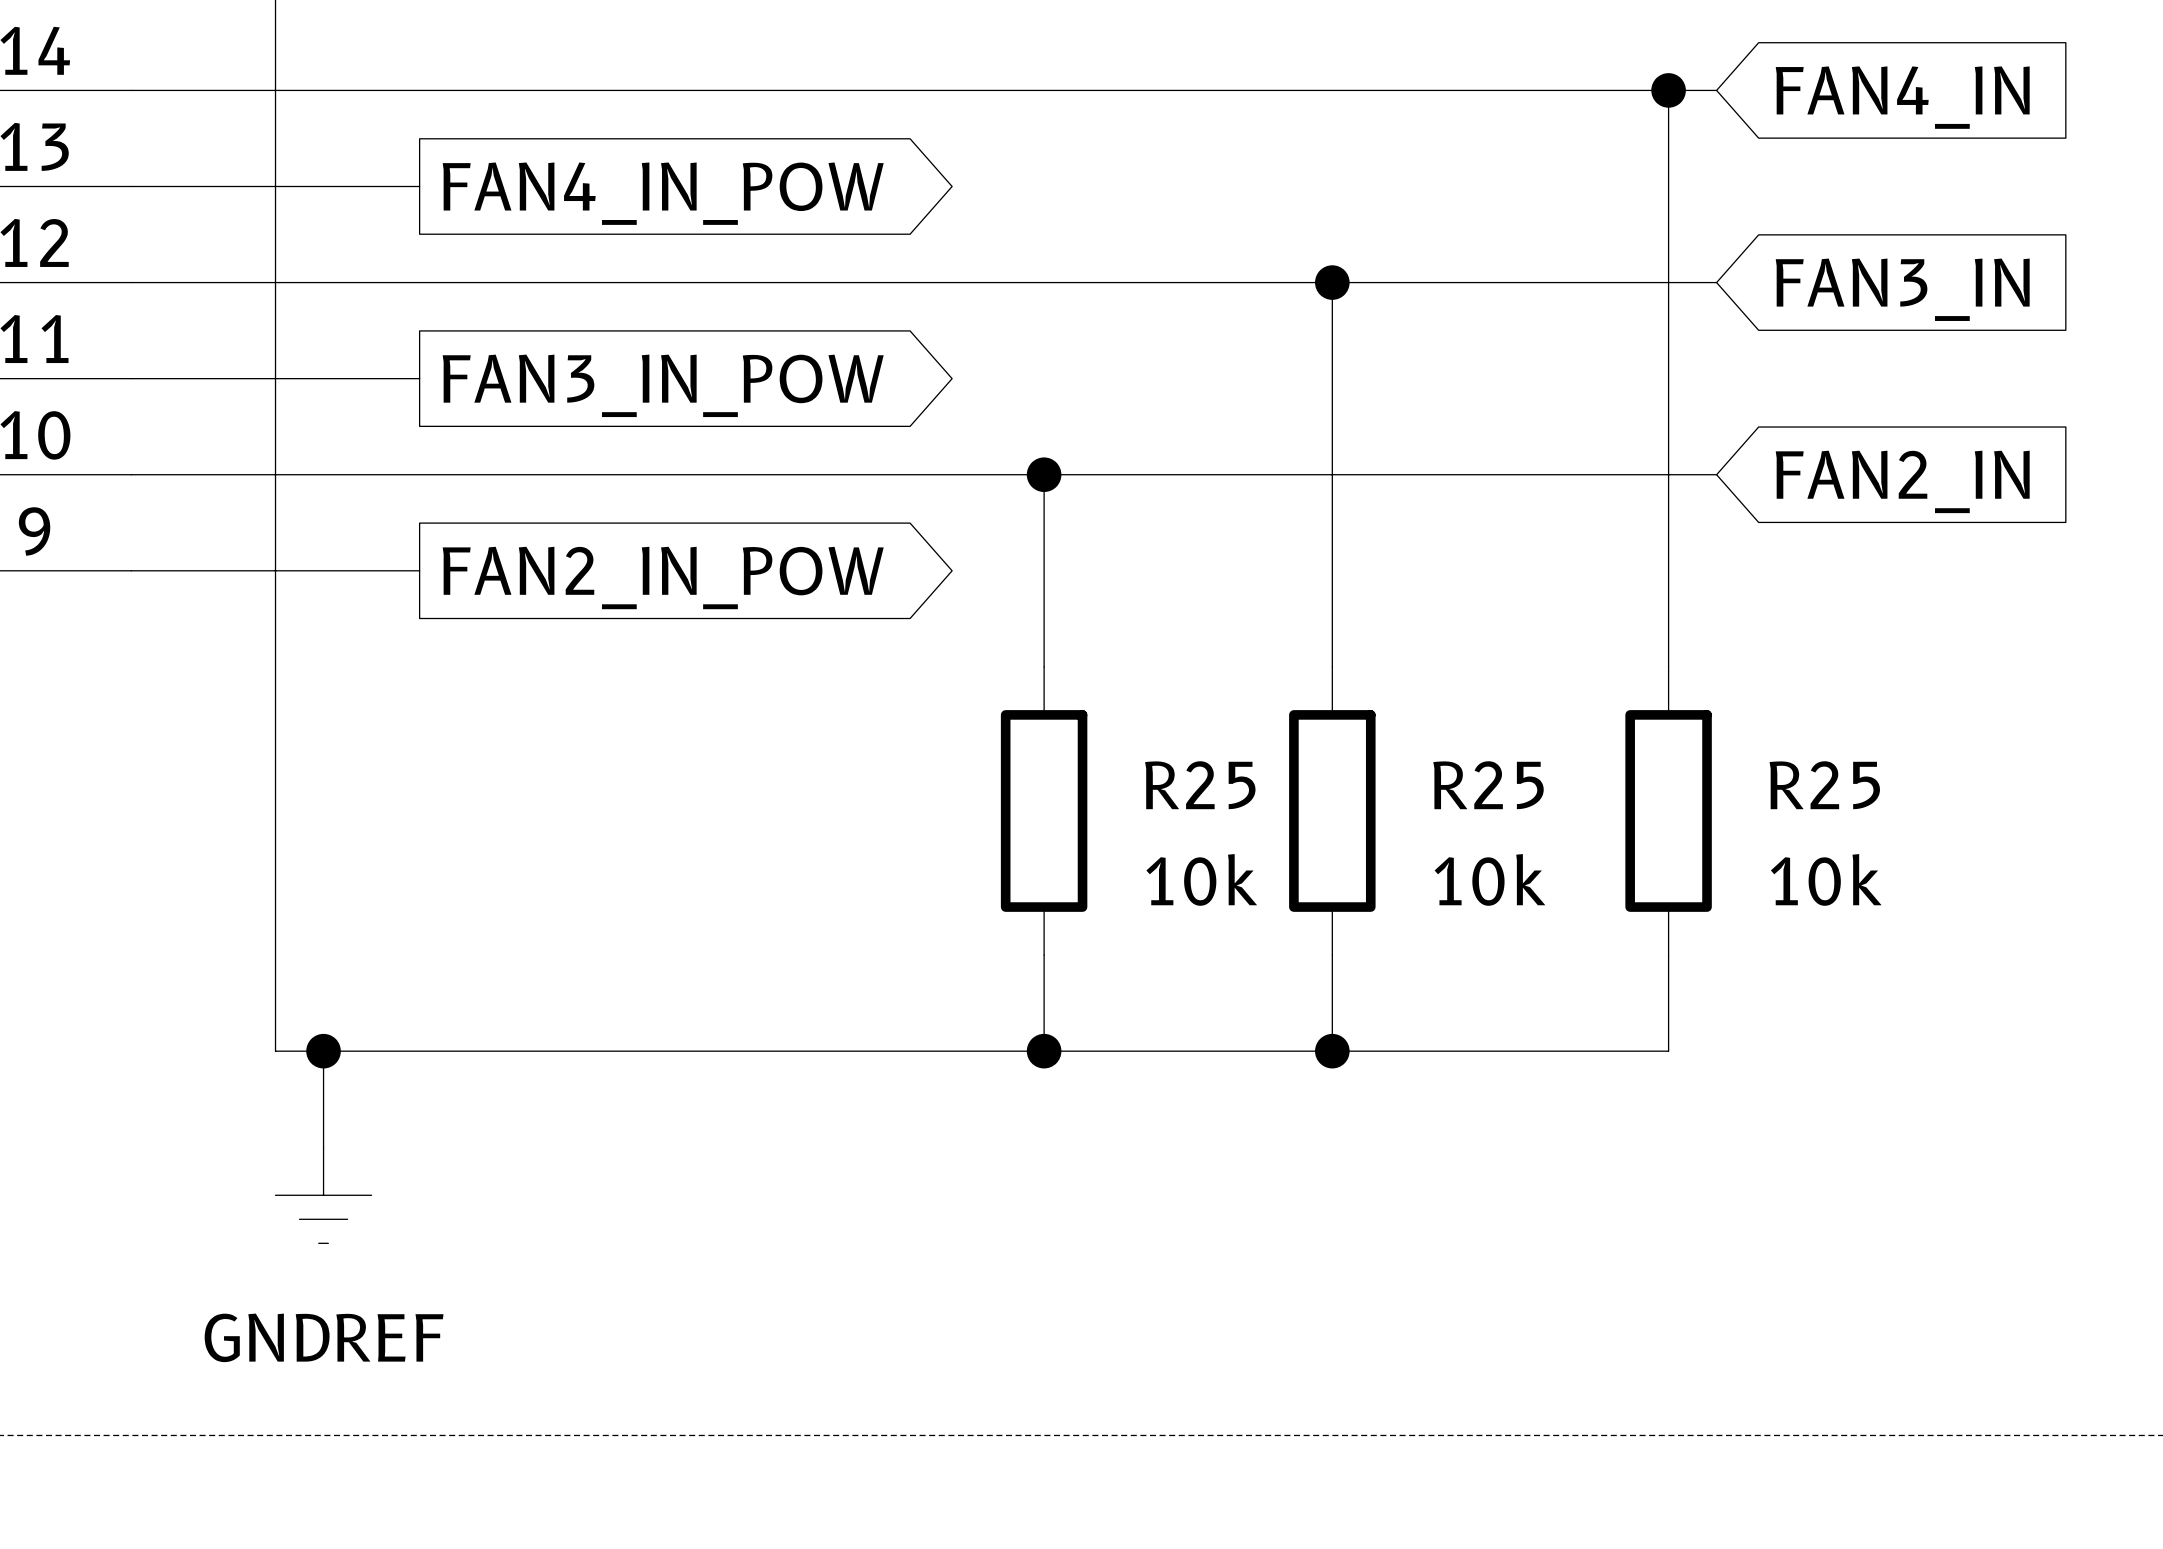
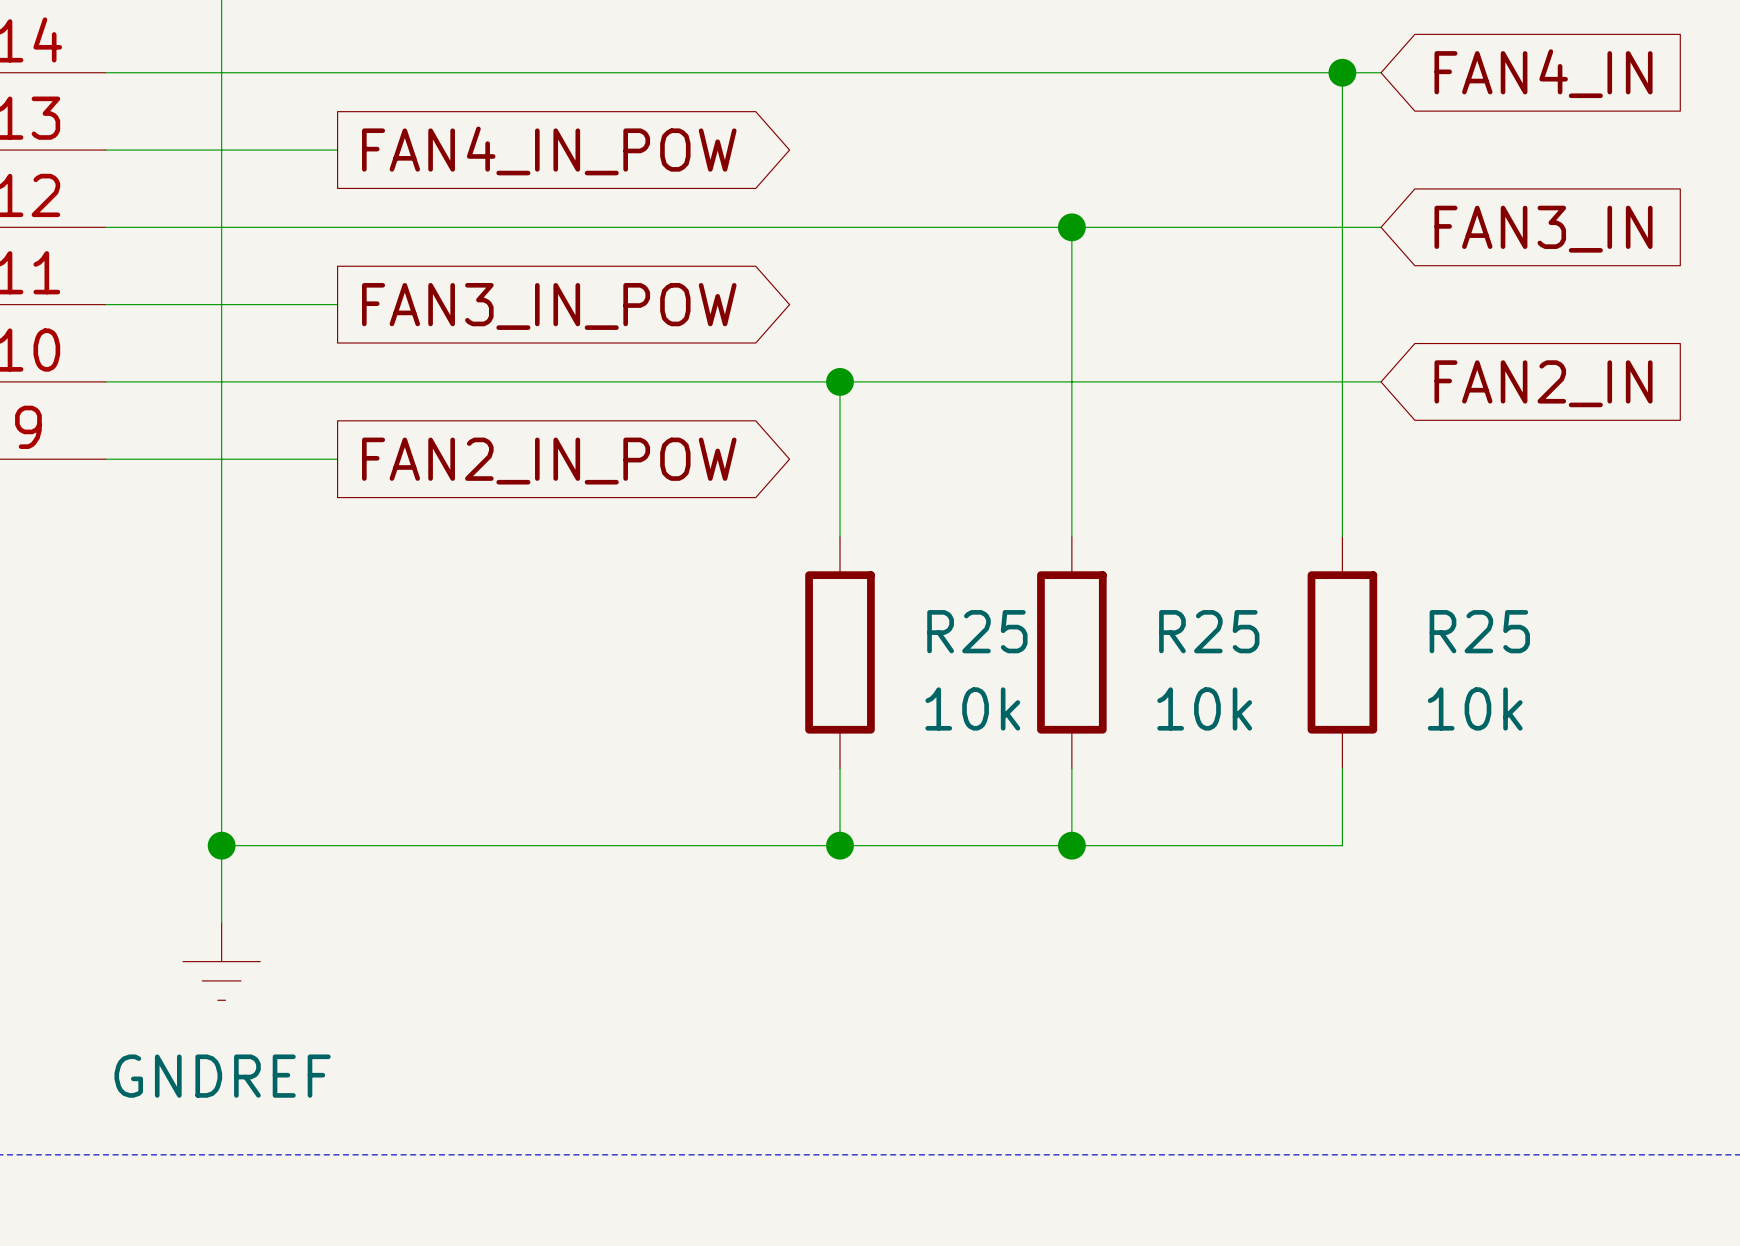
wire: (323, 1051) (323, 1147) -> (221, 845) (221, 922)
junction position: (323, 1051) -> (221, 845)
power symbol position: GNDREF (323, 1195) -> GNDREF (221, 961)

